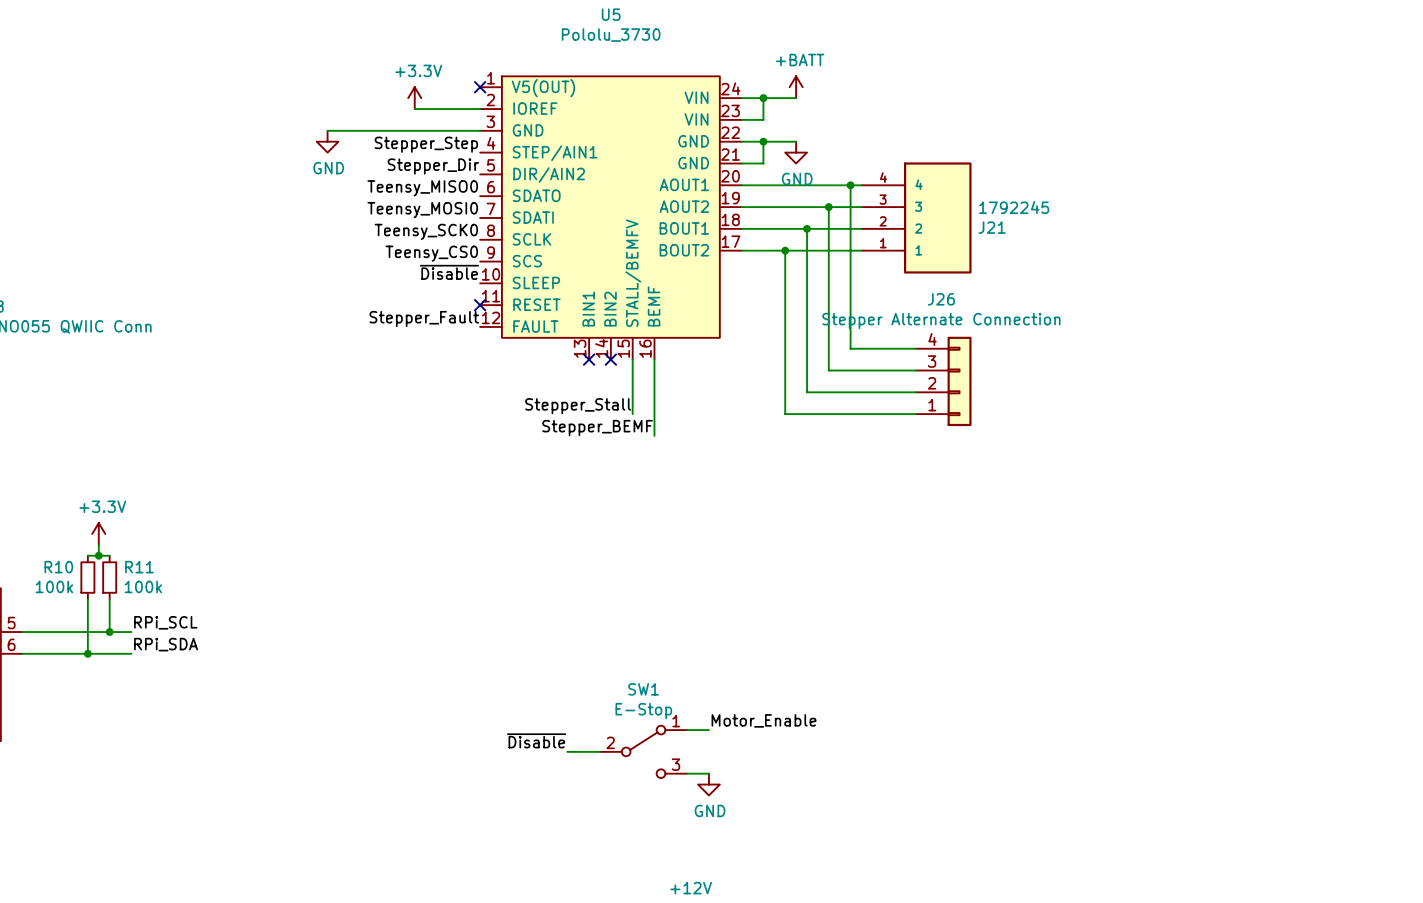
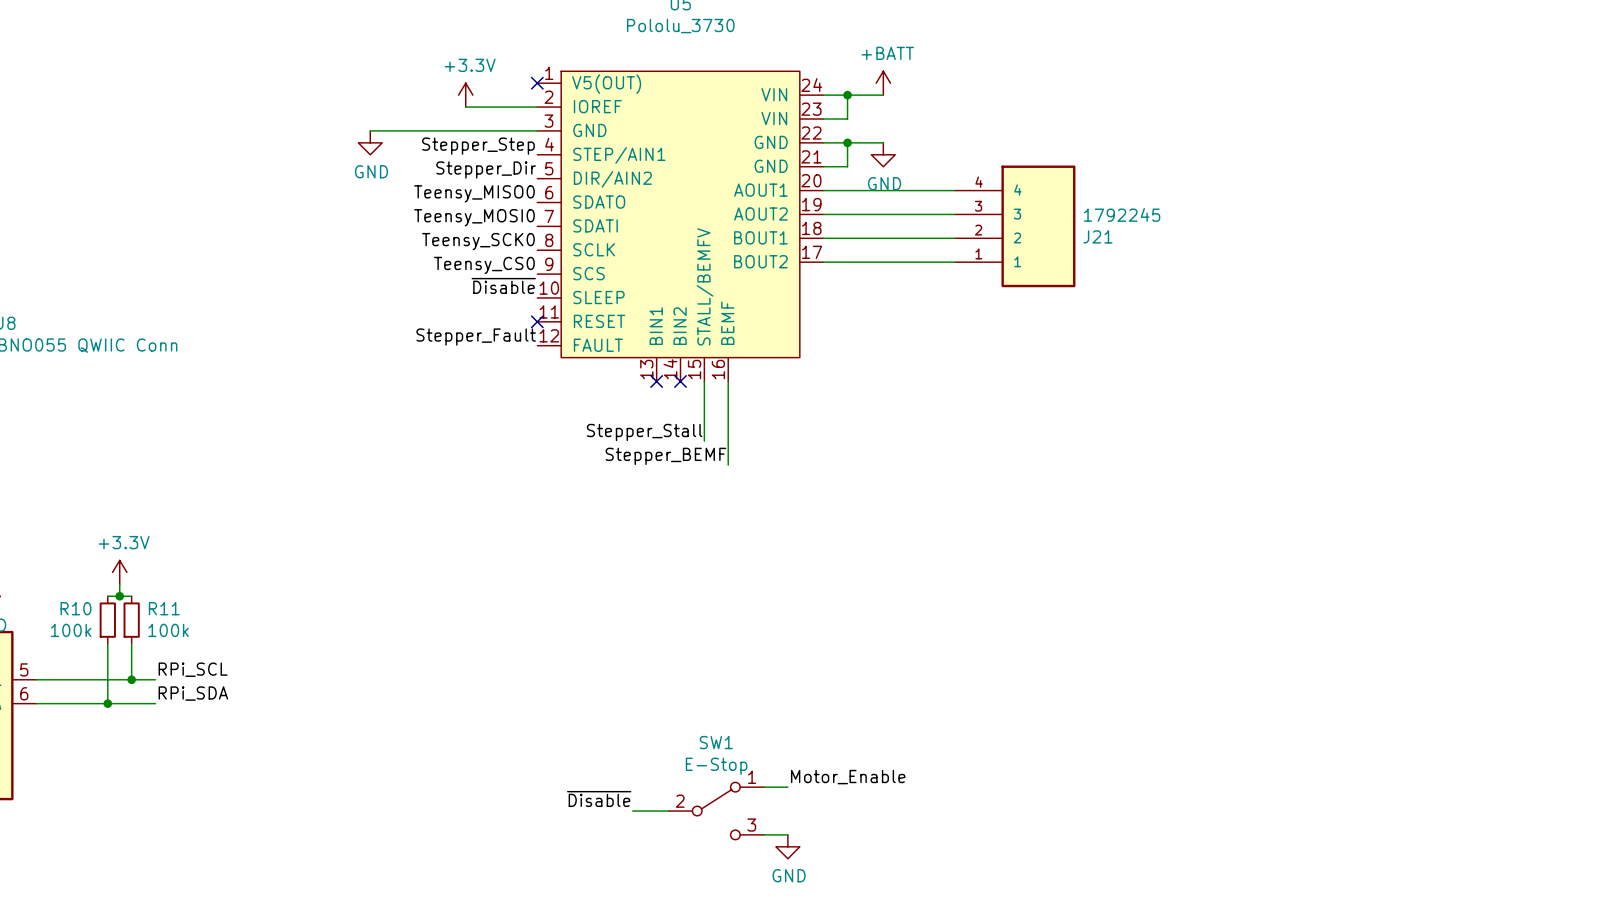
wire: (850, 185) (850, 348) (915, 348) -> none
junction: (850, 185) -> none
wire: (828, 207) (828, 370) (915, 370) -> none
junction: (828, 207) -> none
wire: (807, 228) (807, 392) (915, 392) -> none
junction: (807, 228) -> none
wire: (785, 250) (785, 414) (915, 414) -> none
junction: (785, 250) -> none
J26: Stepper Alternate Connection (943, 381) -> none

